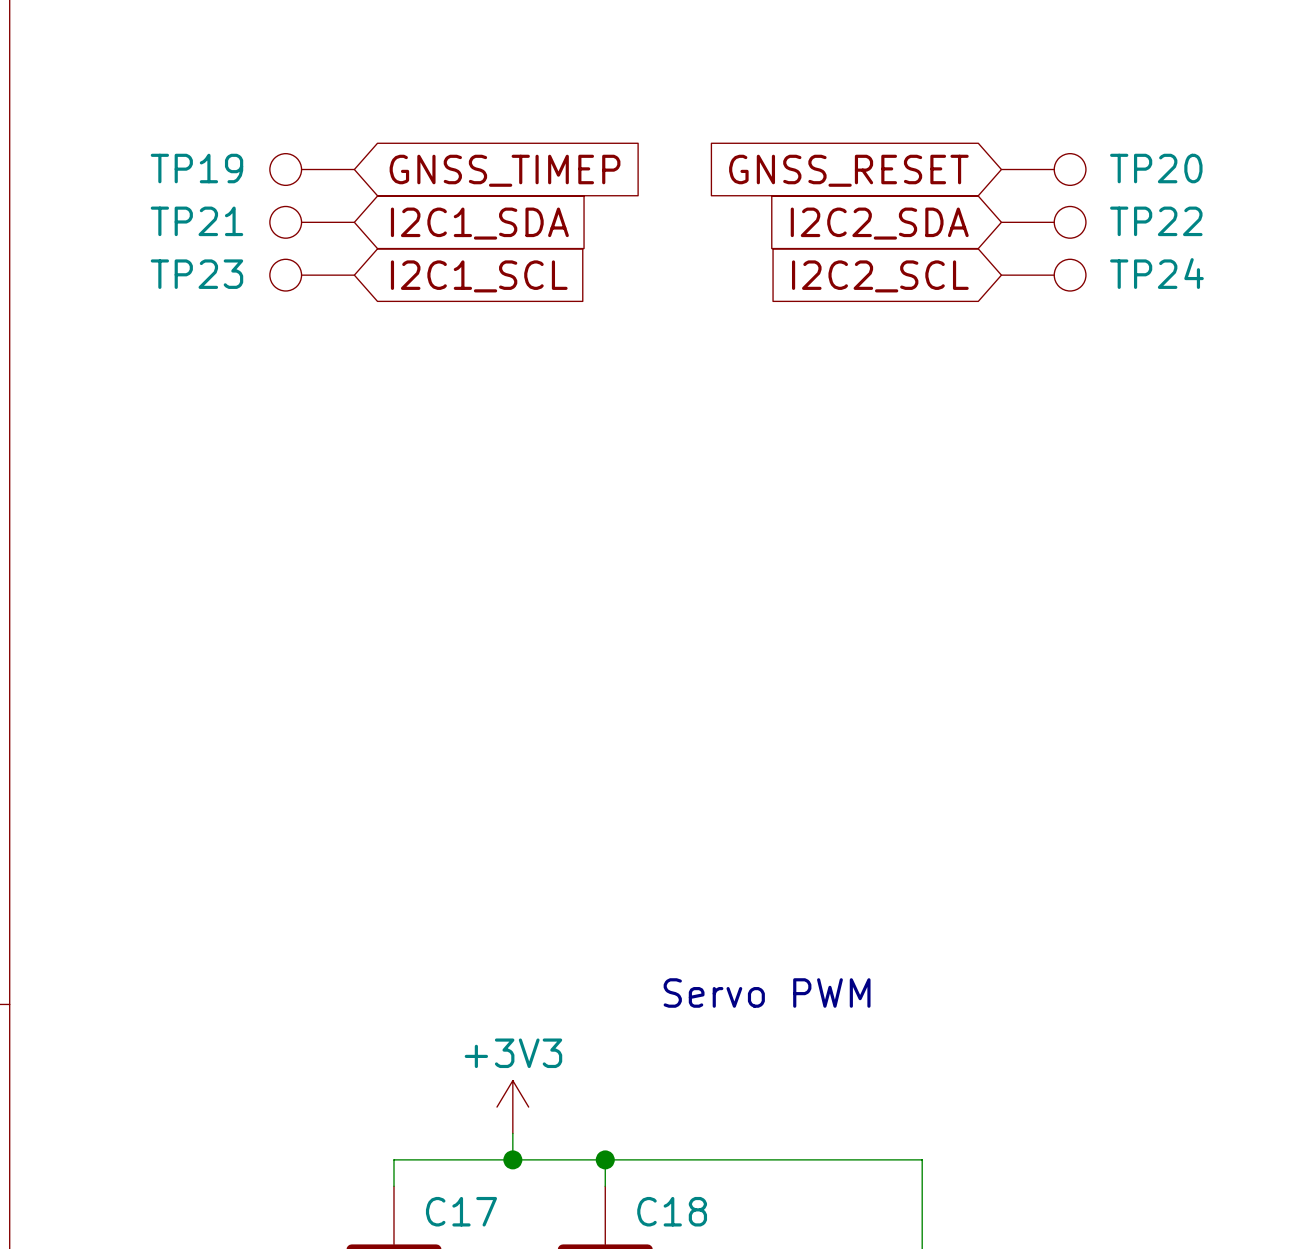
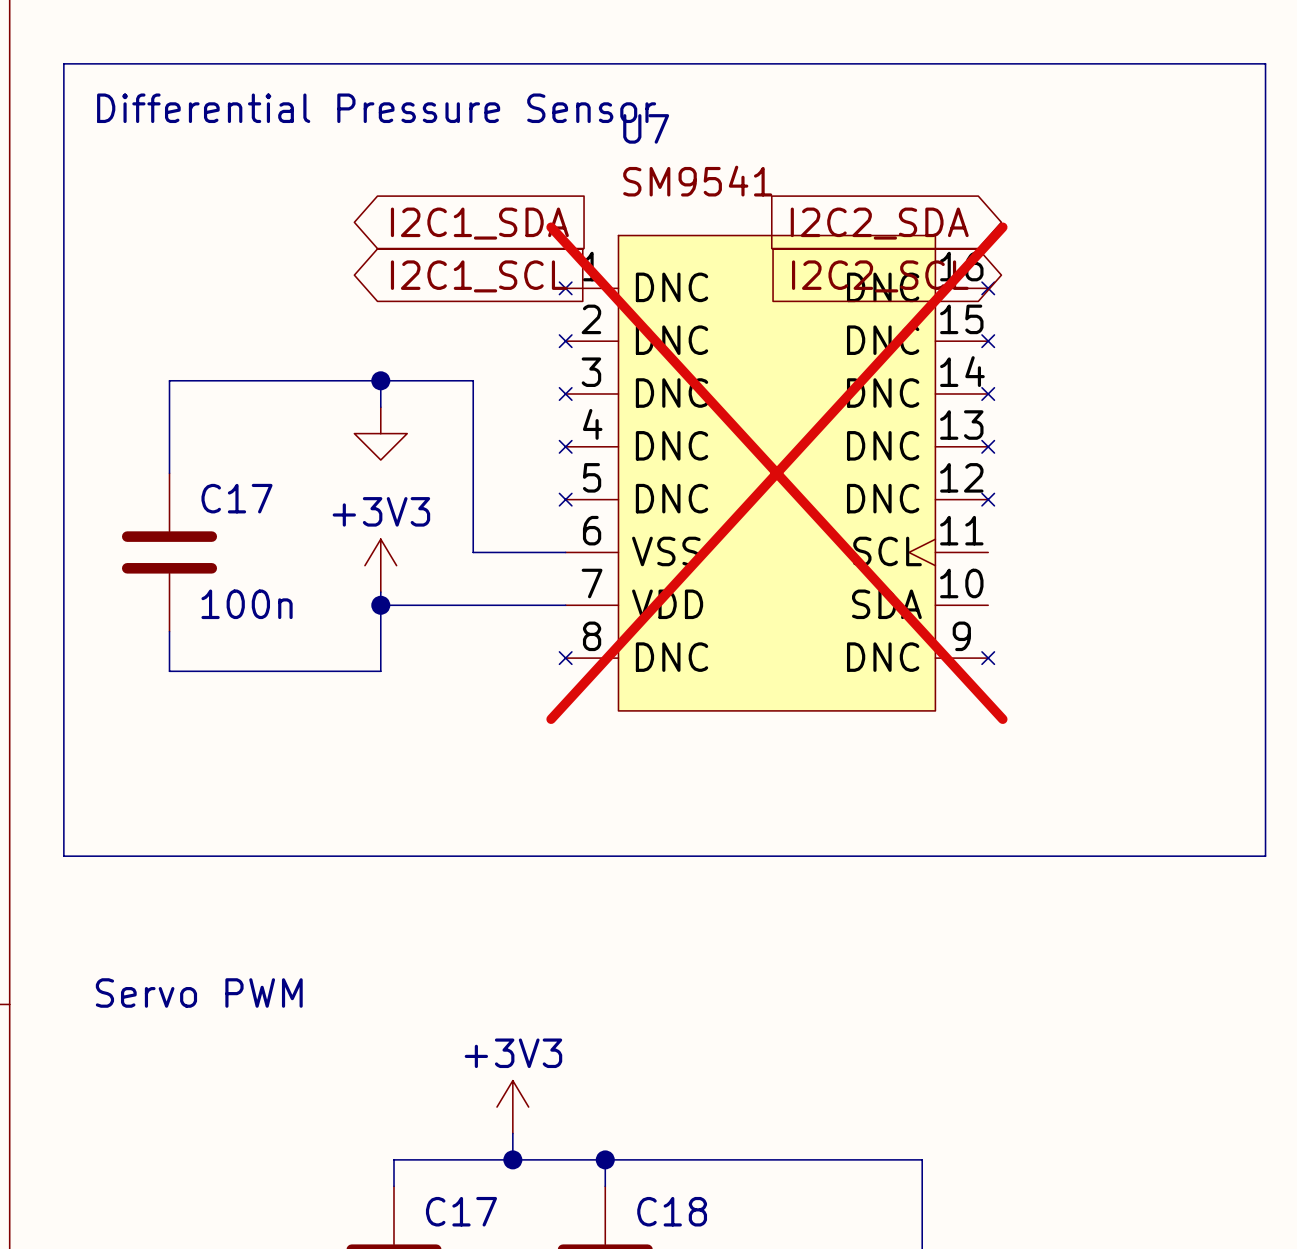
line: none -> (63, 63) (1265, 63) (1265, 856) (63, 856) (63, 63)
text: none -> Differential Pressure Sensor (376, 108)
TP19: (312, 169) -> none
TP20: (1043, 169) -> none
global label: GNSS_TIMEP (505, 170) -> none
global label: GNSS_RESET (848, 170) -> none
TP21: (312, 222) -> none
TP22: (1043, 222) -> none
TP23: (312, 275) -> none
TP24: (1043, 275) -> none
wire: none -> (380, 380) (380, 407)
junction: none -> (380, 380)
power symbol: none -> (380, 433)
wire: none -> (169, 473) (169, 380) (473, 380) (473, 552) (565, 552)
U7: none -> (776, 473)
C17: none -> 100n (169, 552)
power symbol: none -> +3V3 (380, 565)
wire: none -> (380, 592) (380, 671) (169, 671) (169, 631)
wire: none -> (380, 605) (565, 605)
junction: none -> (380, 605)
text: none -> Servo PWM (199, 993)
text: Servo PWM (767, 993) -> none

